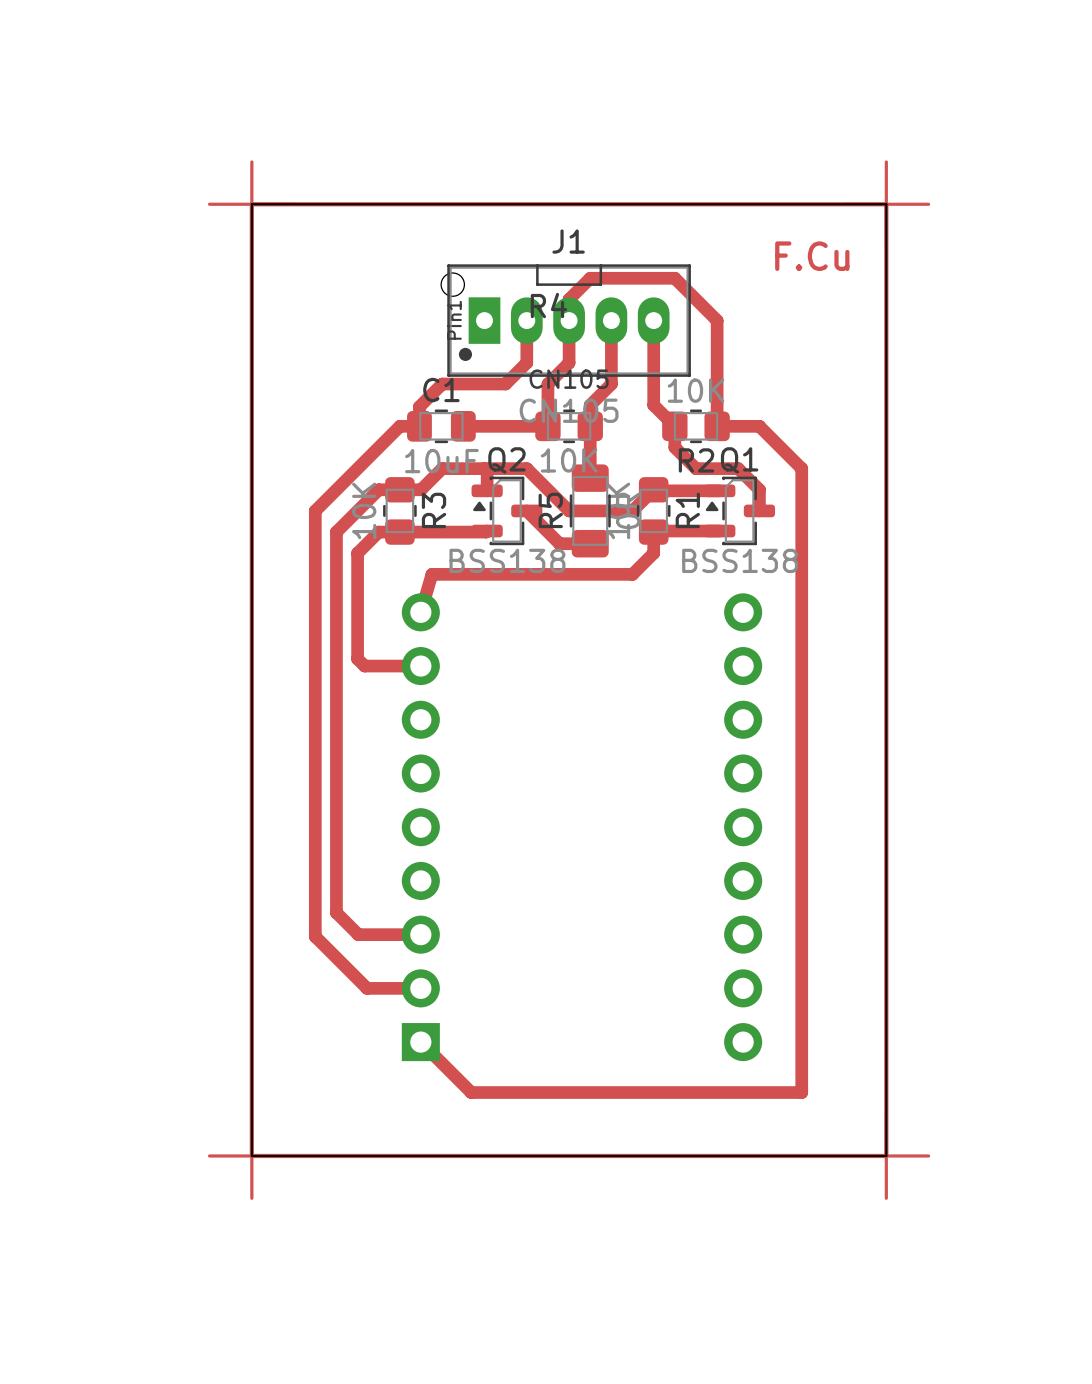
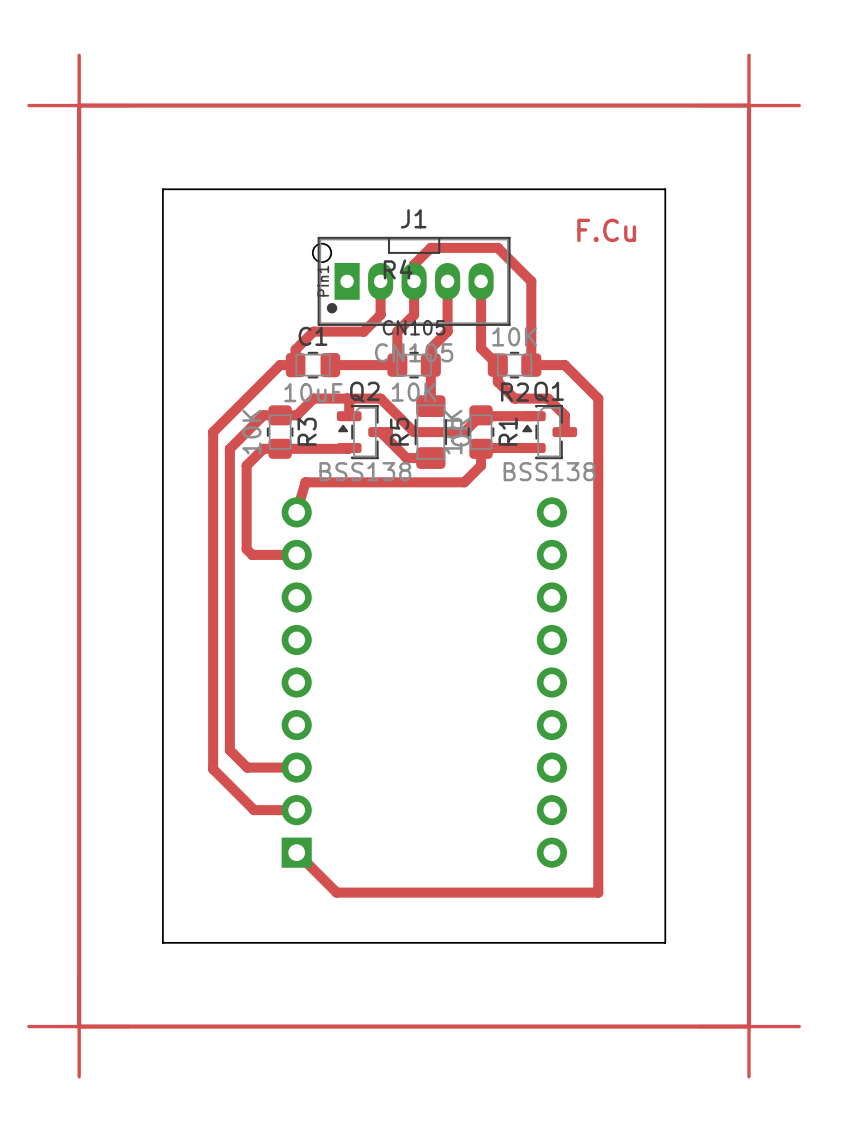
top track: none -> (79, 55) (79, 155)
top track: none -> (749, 55) (749, 155)
top track: none -> (28, 105) (129, 105)
top track: none -> (698, 105) (799, 105)
top track: (251, 161) (251, 246) -> none
top track: (886, 161) (886, 246) -> none
top track: (209, 204) (294, 204) -> none
top track: (251, 204) (886, 204) (886, 1155) (251, 1155) (251, 204) -> (79, 105) (79, 1026) (749, 1026) (749, 105) (79, 105)
top track: (844, 204) (928, 204) -> none
top track: (251, 1113) (251, 1198) -> none
top track: (886, 1113) (886, 1198) -> none
top track: (209, 1155) (294, 1155) -> none
top track: (844, 1155) (928, 1155) -> none
top track: none -> (79, 976) (79, 1076)
top track: none -> (749, 976) (749, 1076)
top track: none -> (28, 1026) (129, 1026)
top track: none -> (698, 1026) (799, 1026)

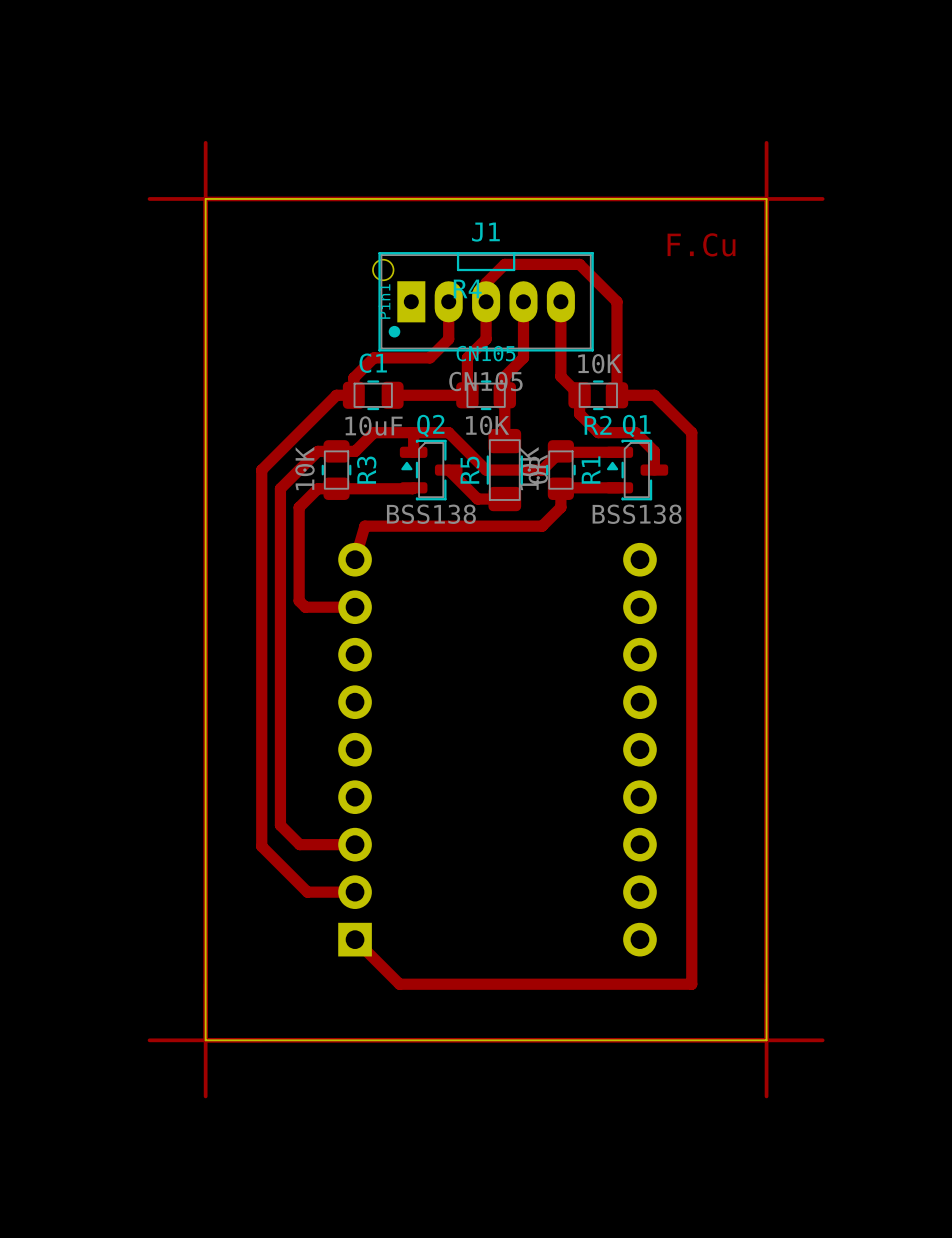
top track: (79, 55) (79, 155) -> (205, 142) (205, 255)
top track: (749, 55) (749, 155) -> (766, 142) (766, 255)
top track: (28, 105) (129, 105) -> (149, 198) (261, 198)
top track: (79, 105) (749, 105) (749, 1026) (79, 1026) (79, 105) -> (205, 198) (205, 1040) (766, 1040) (766, 198) (205, 198)
top track: (698, 105) (799, 105) -> (710, 198) (822, 198)
top track: (79, 976) (79, 1076) -> (205, 984) (205, 1096)
top track: (749, 976) (749, 1076) -> (766, 984) (766, 1096)
top track: (28, 1026) (129, 1026) -> (149, 1040) (261, 1040)
top track: (698, 1026) (799, 1026) -> (710, 1040) (822, 1040)

